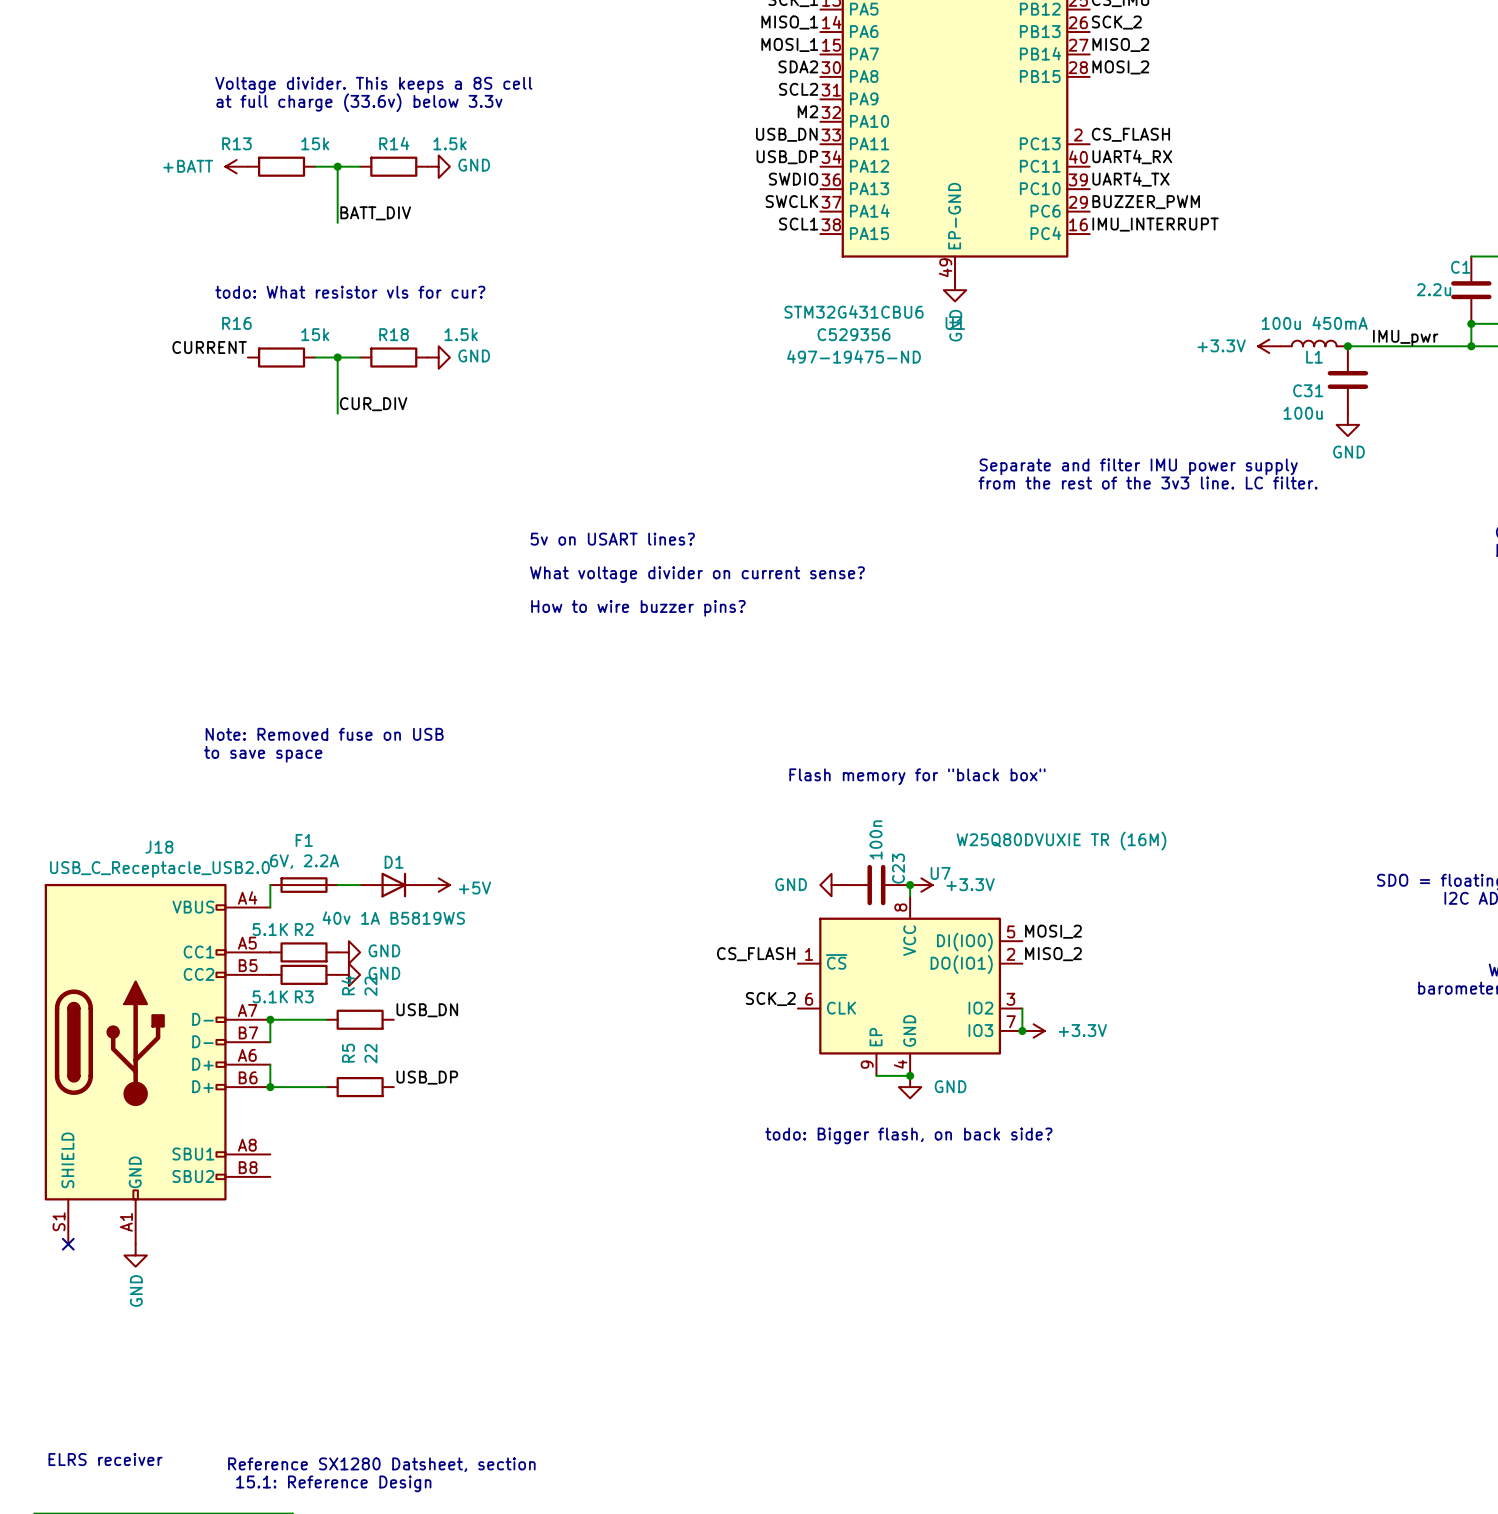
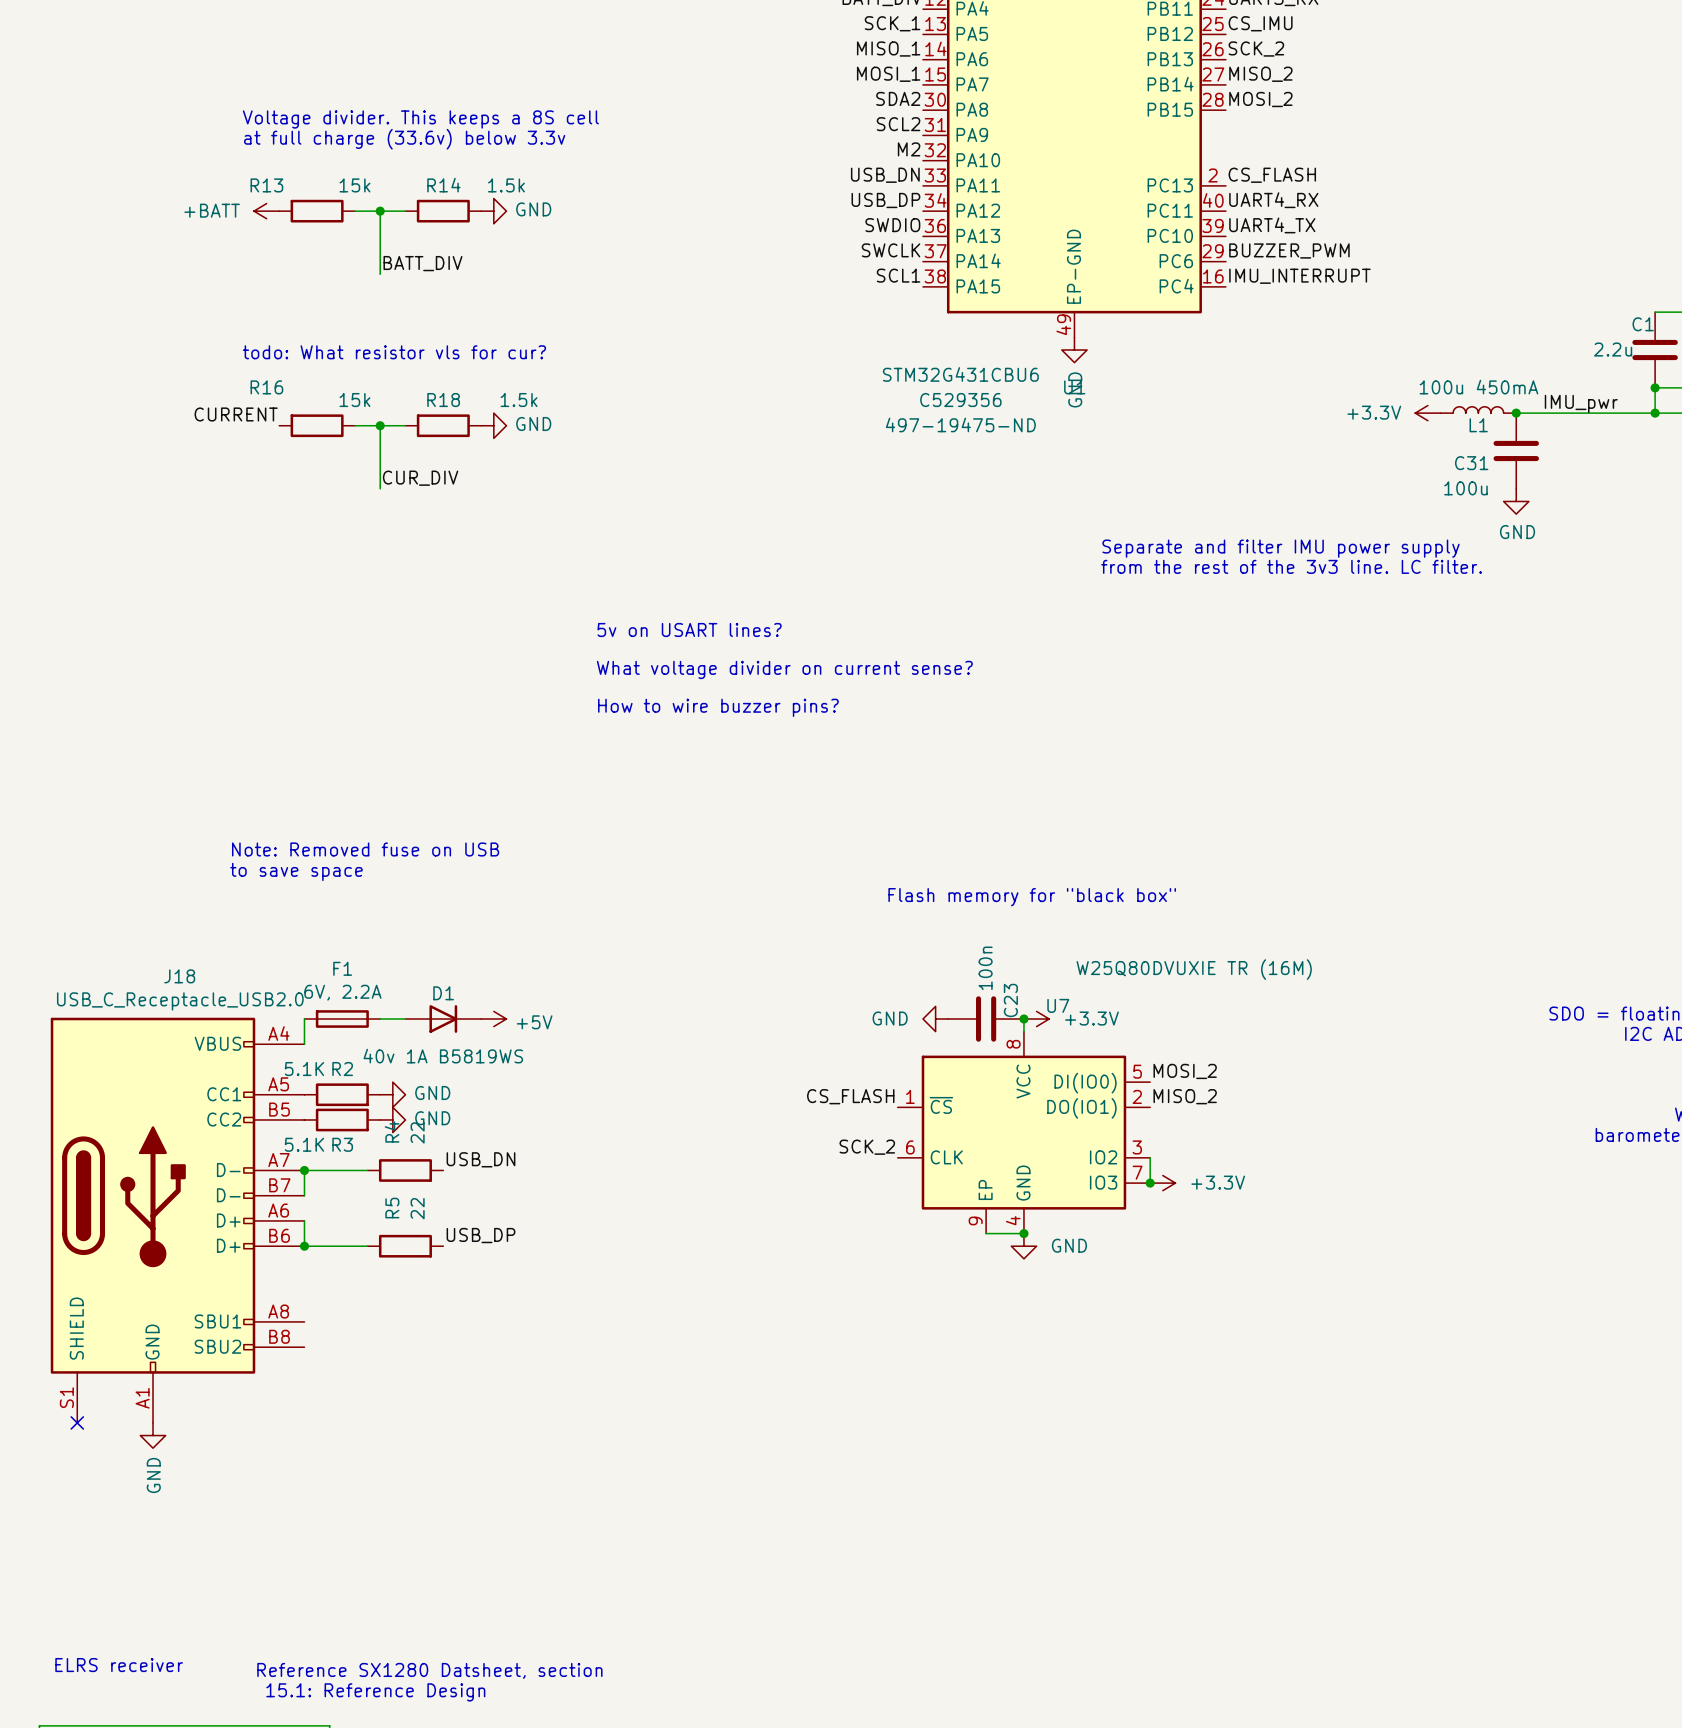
text: todo: Bigger flash, on back side? (908, 1135) -> none

